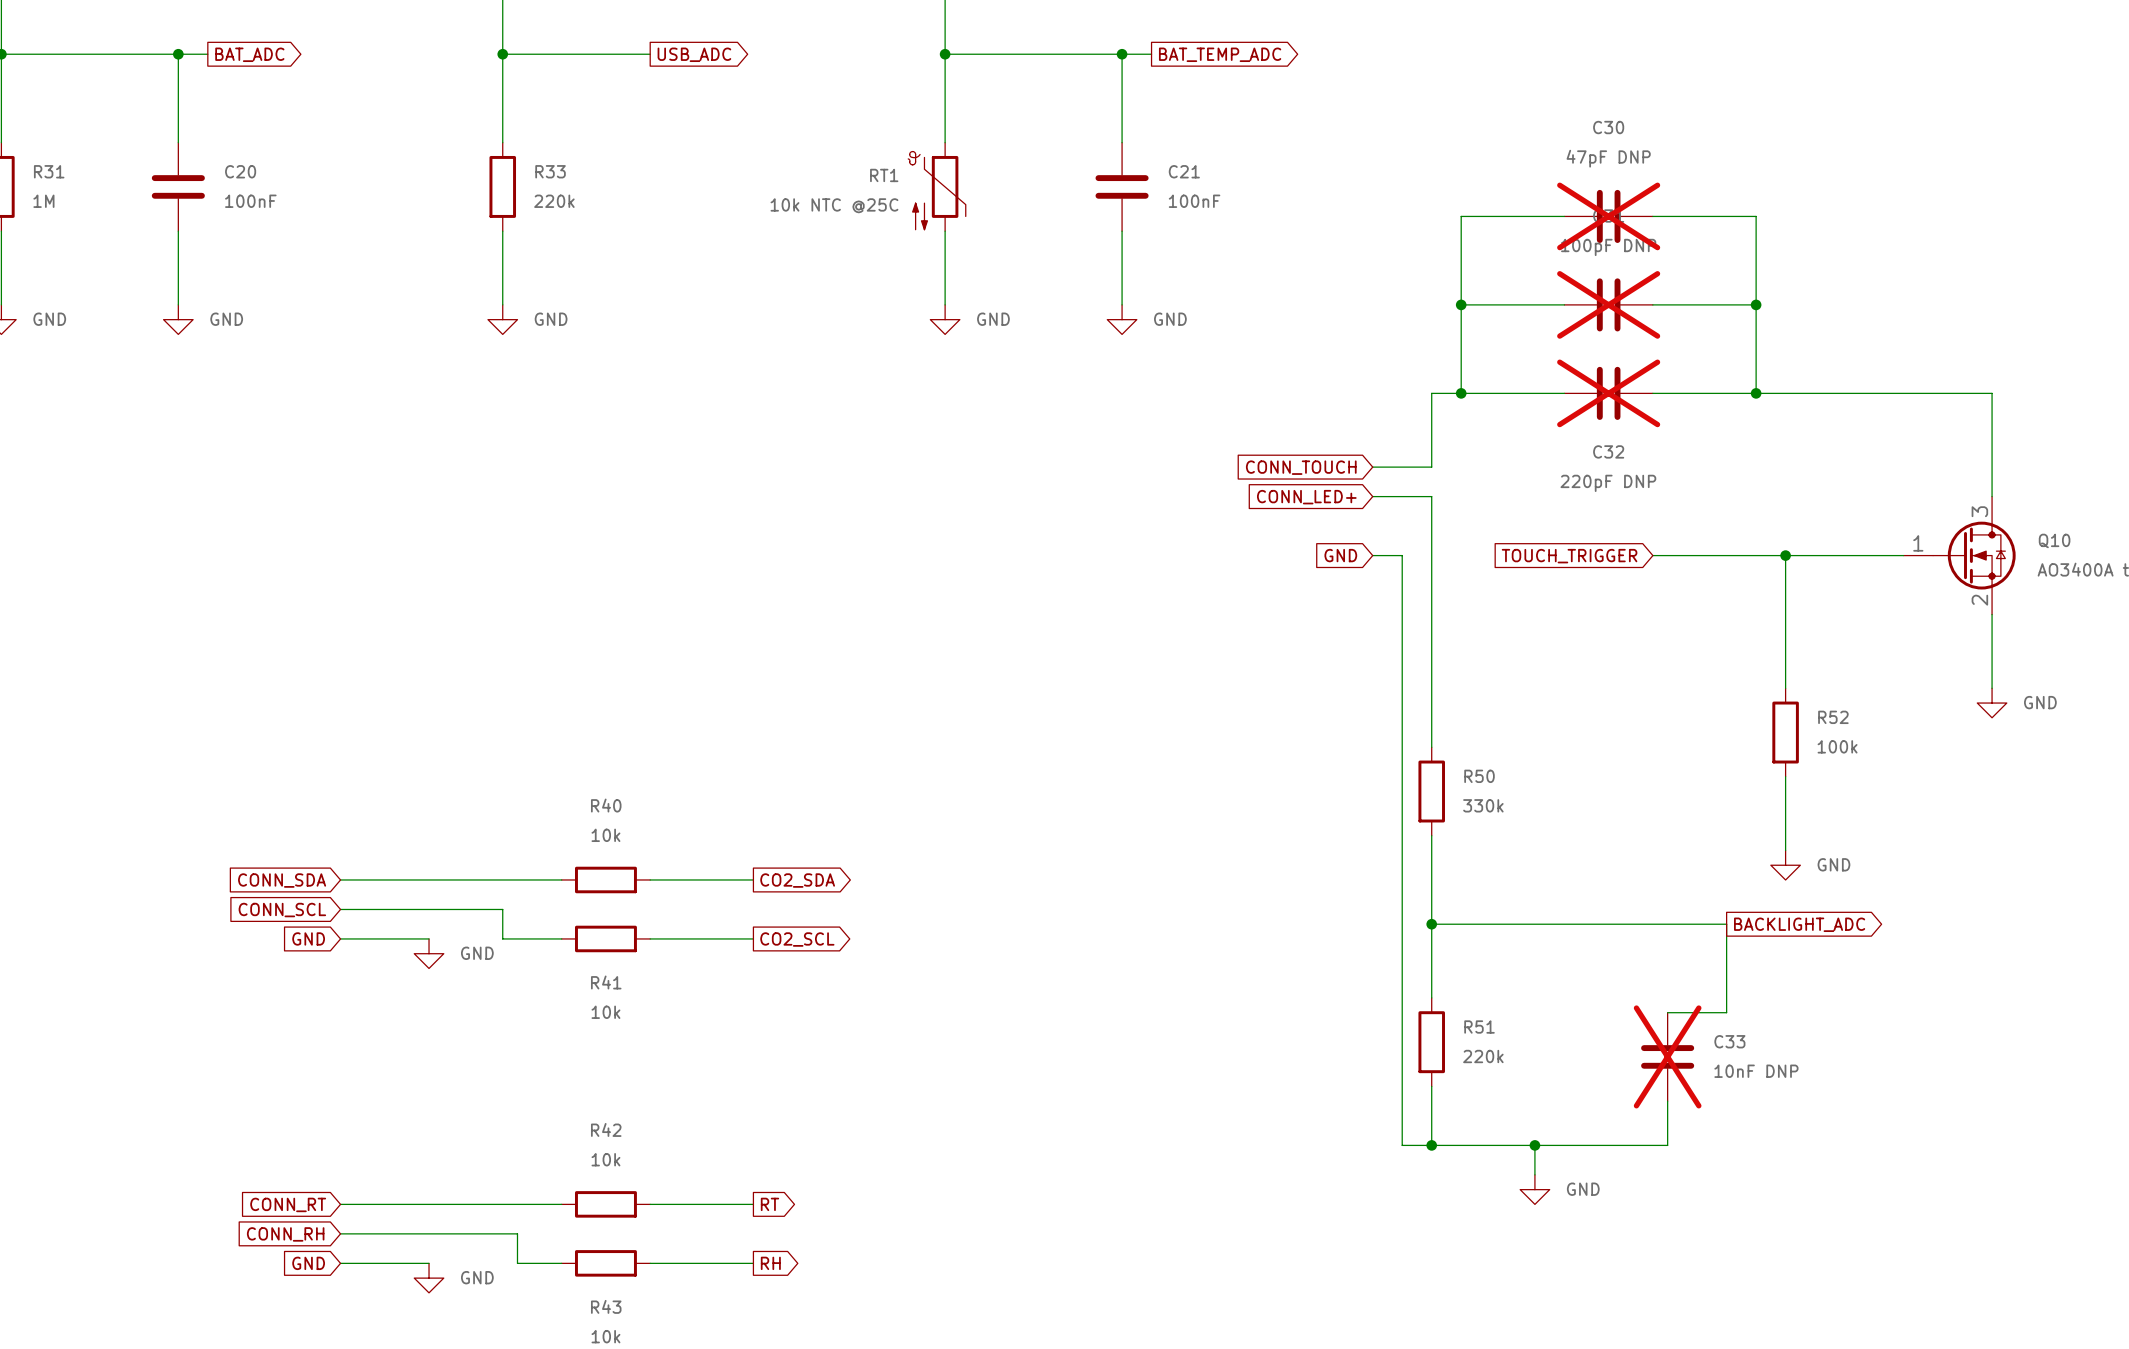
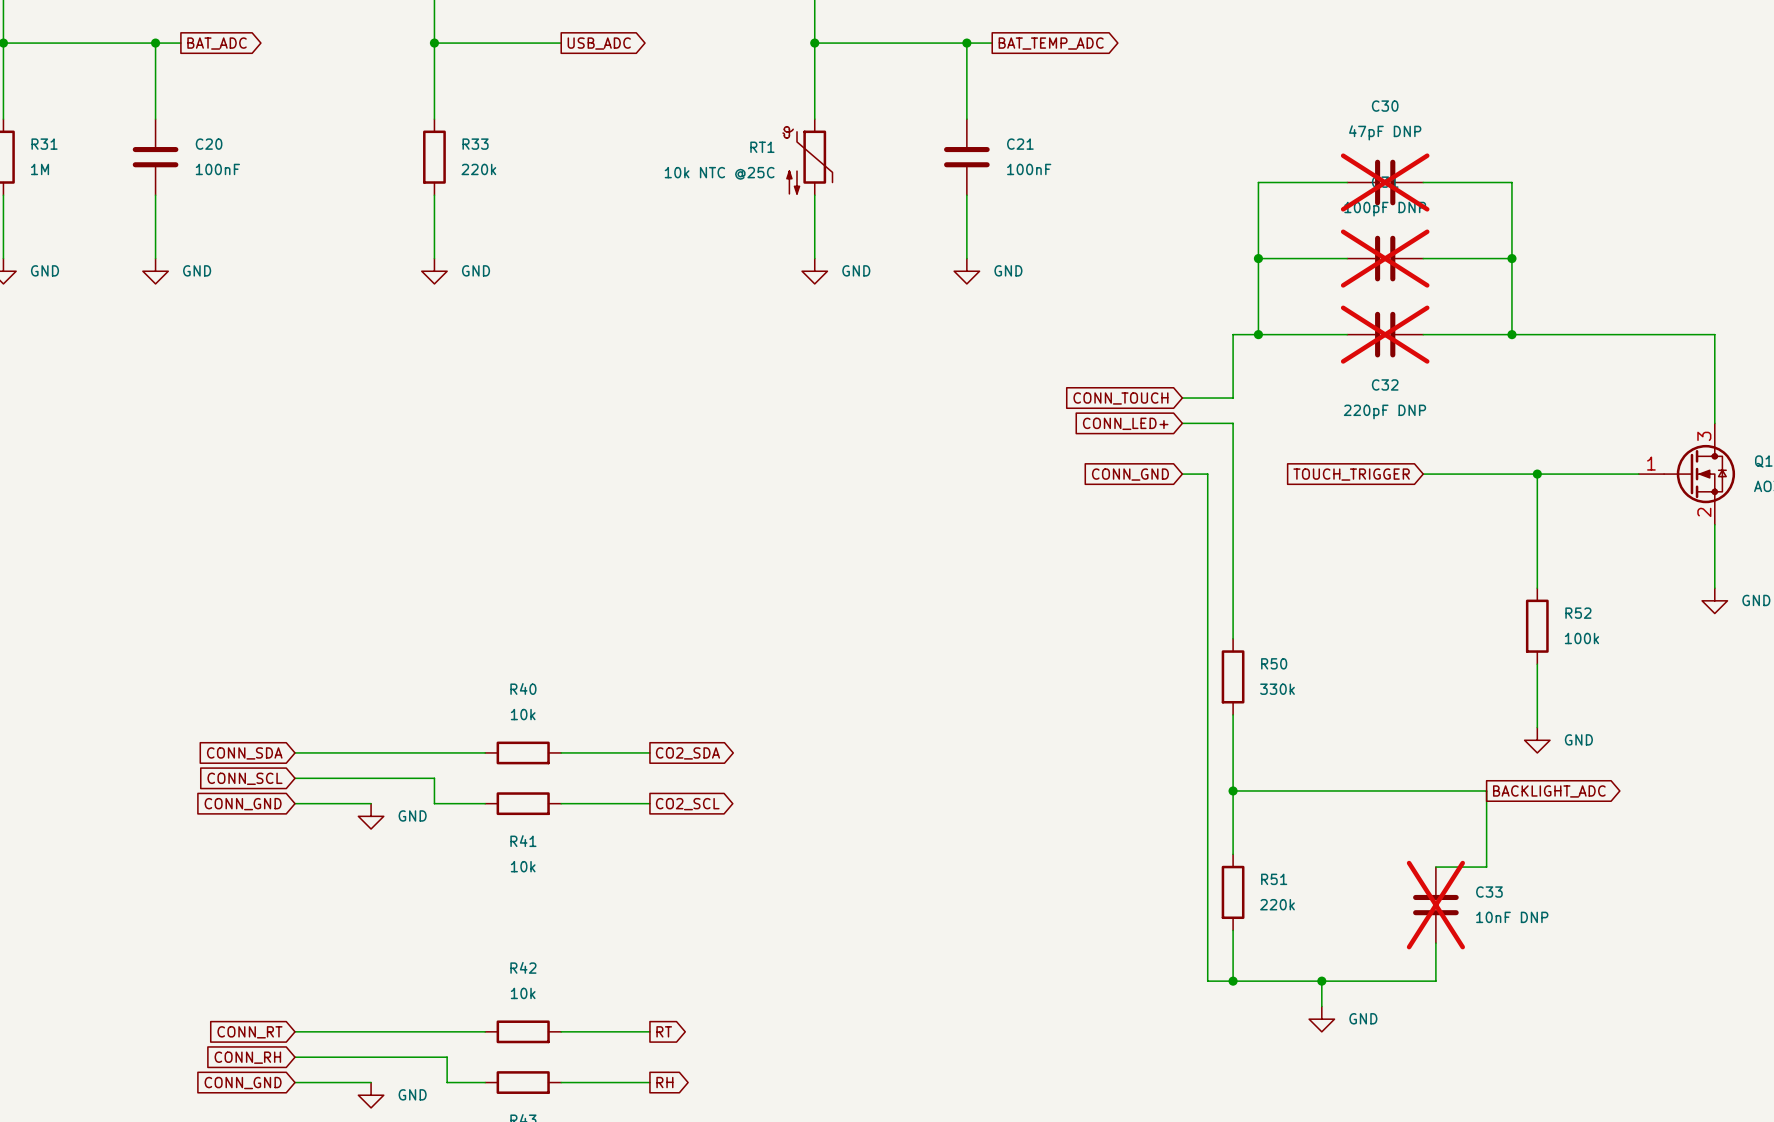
global label: GND (1340, 555) -> CONN_GND (1130, 474)
global label: GND (308, 938) -> CONN_GND (243, 804)
global label: GND (308, 1263) -> CONN_GND (243, 1083)

